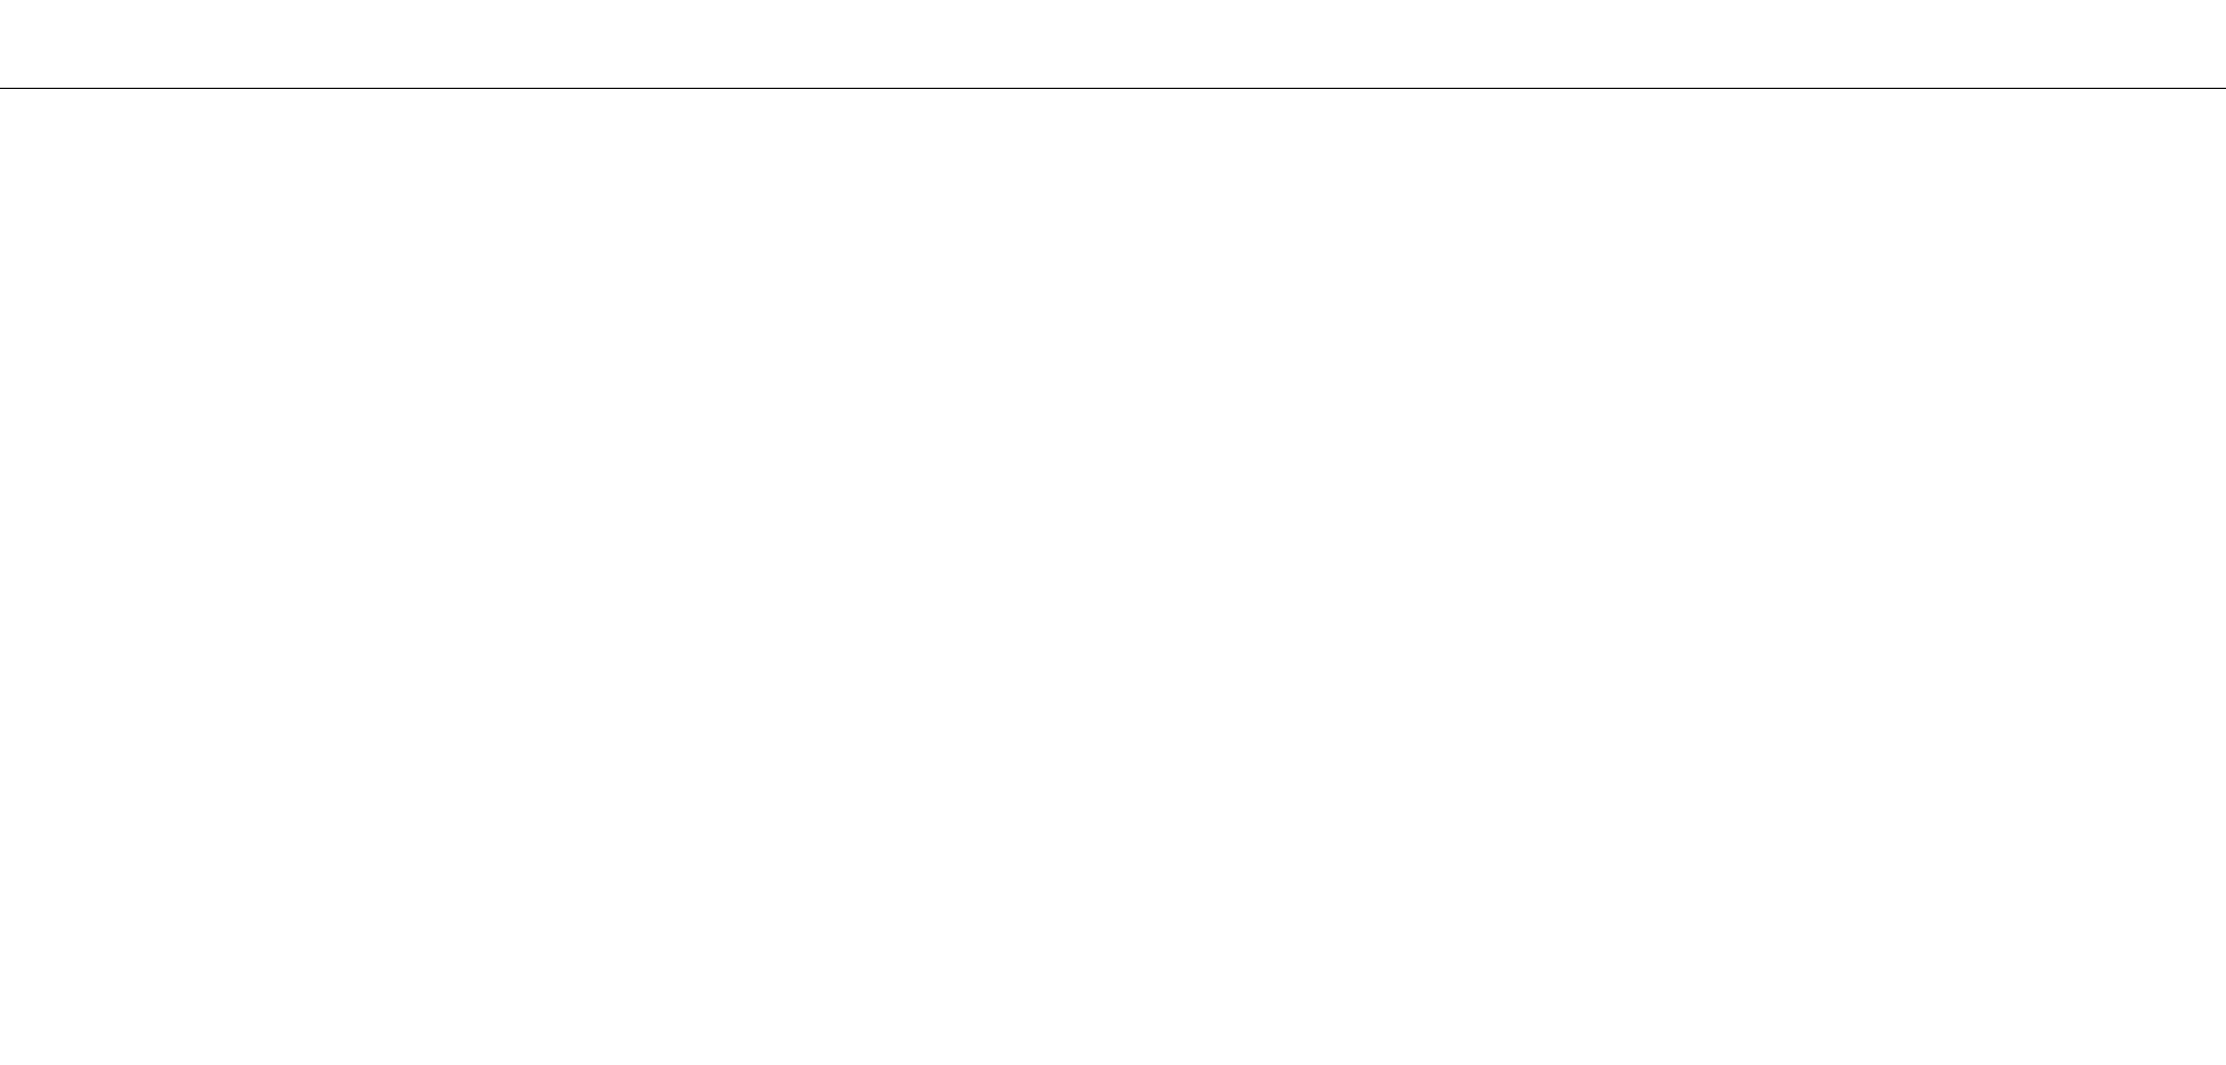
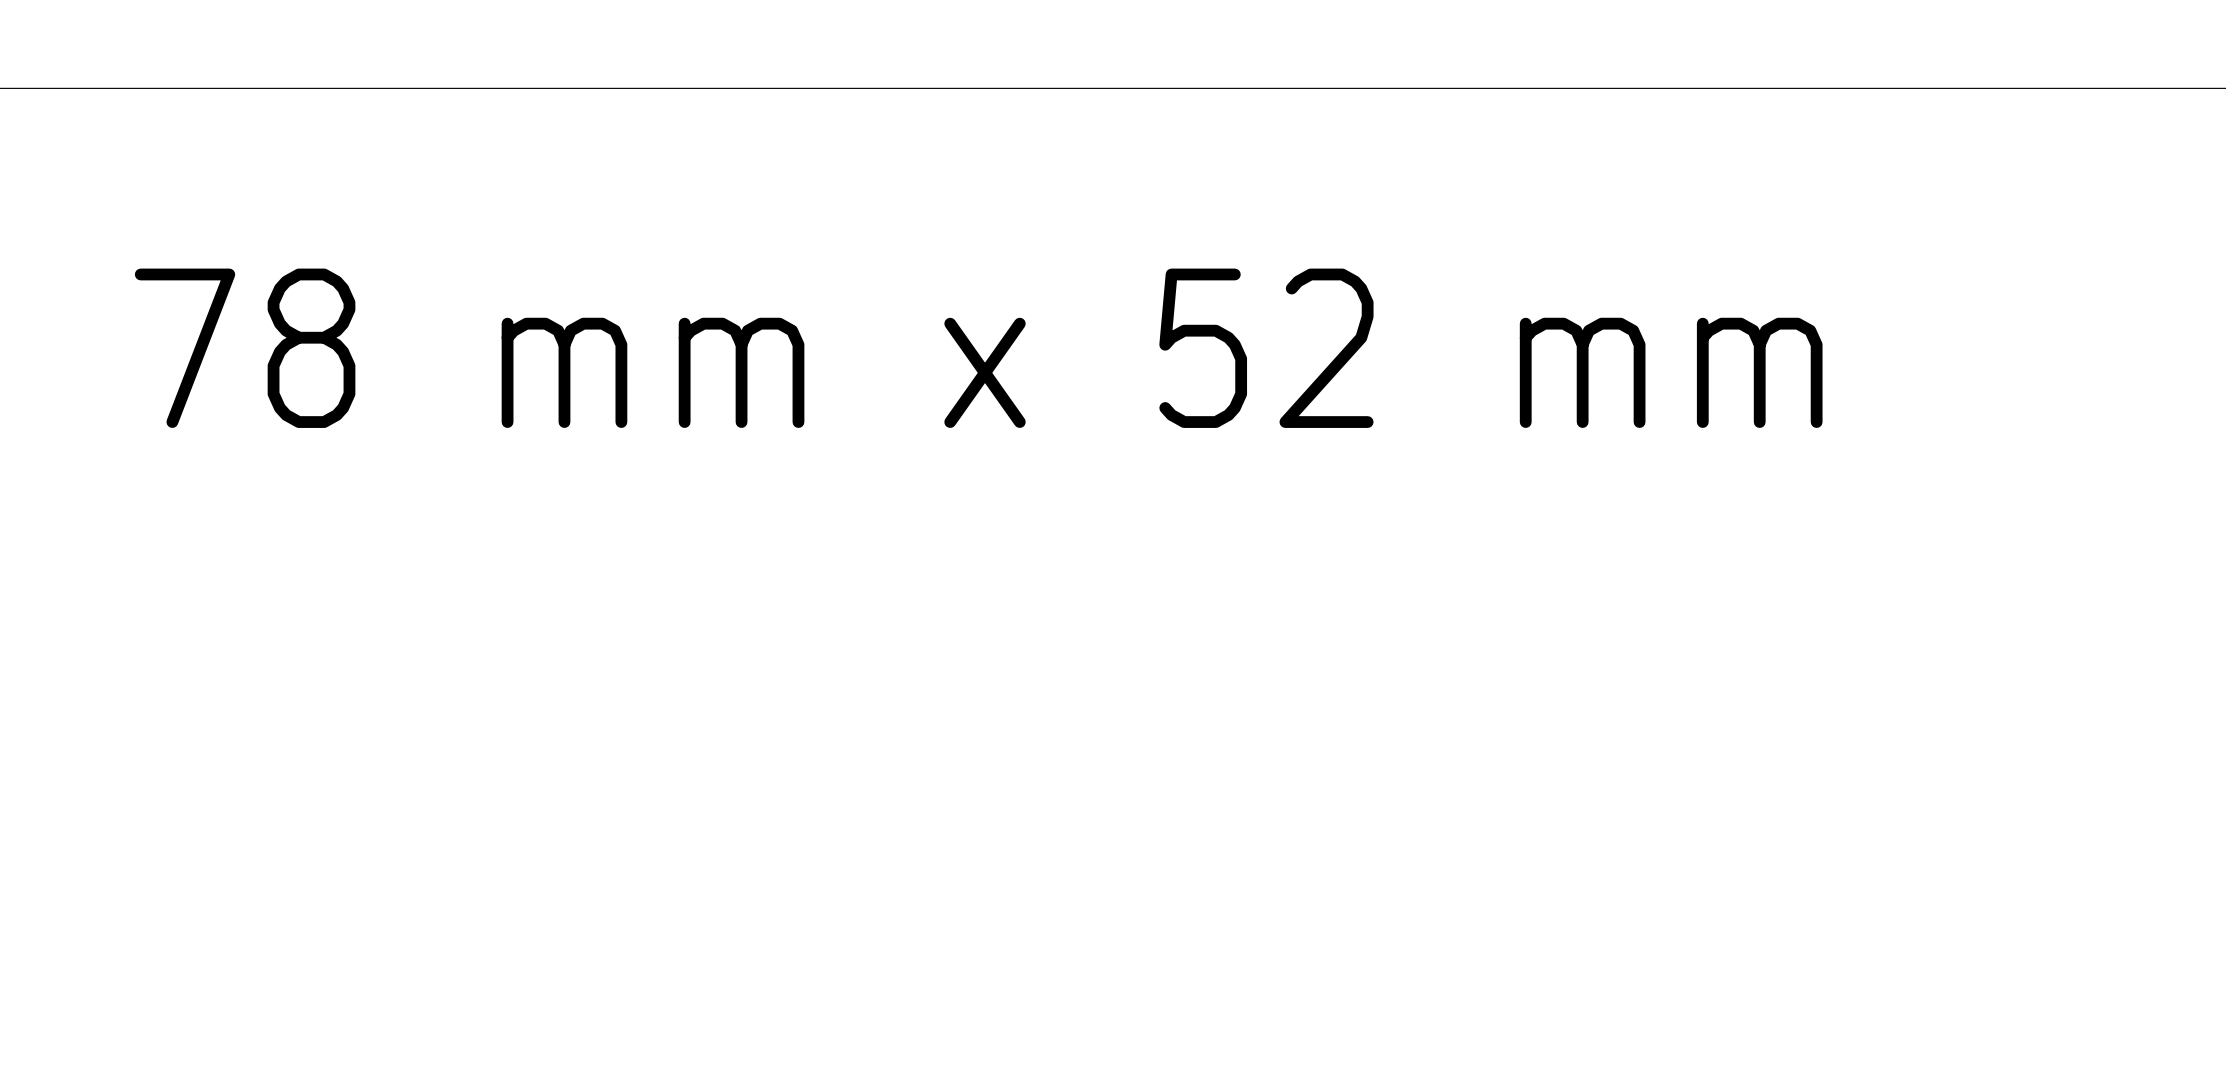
text: none -> 78 mm x 52 mm (978, 348)

